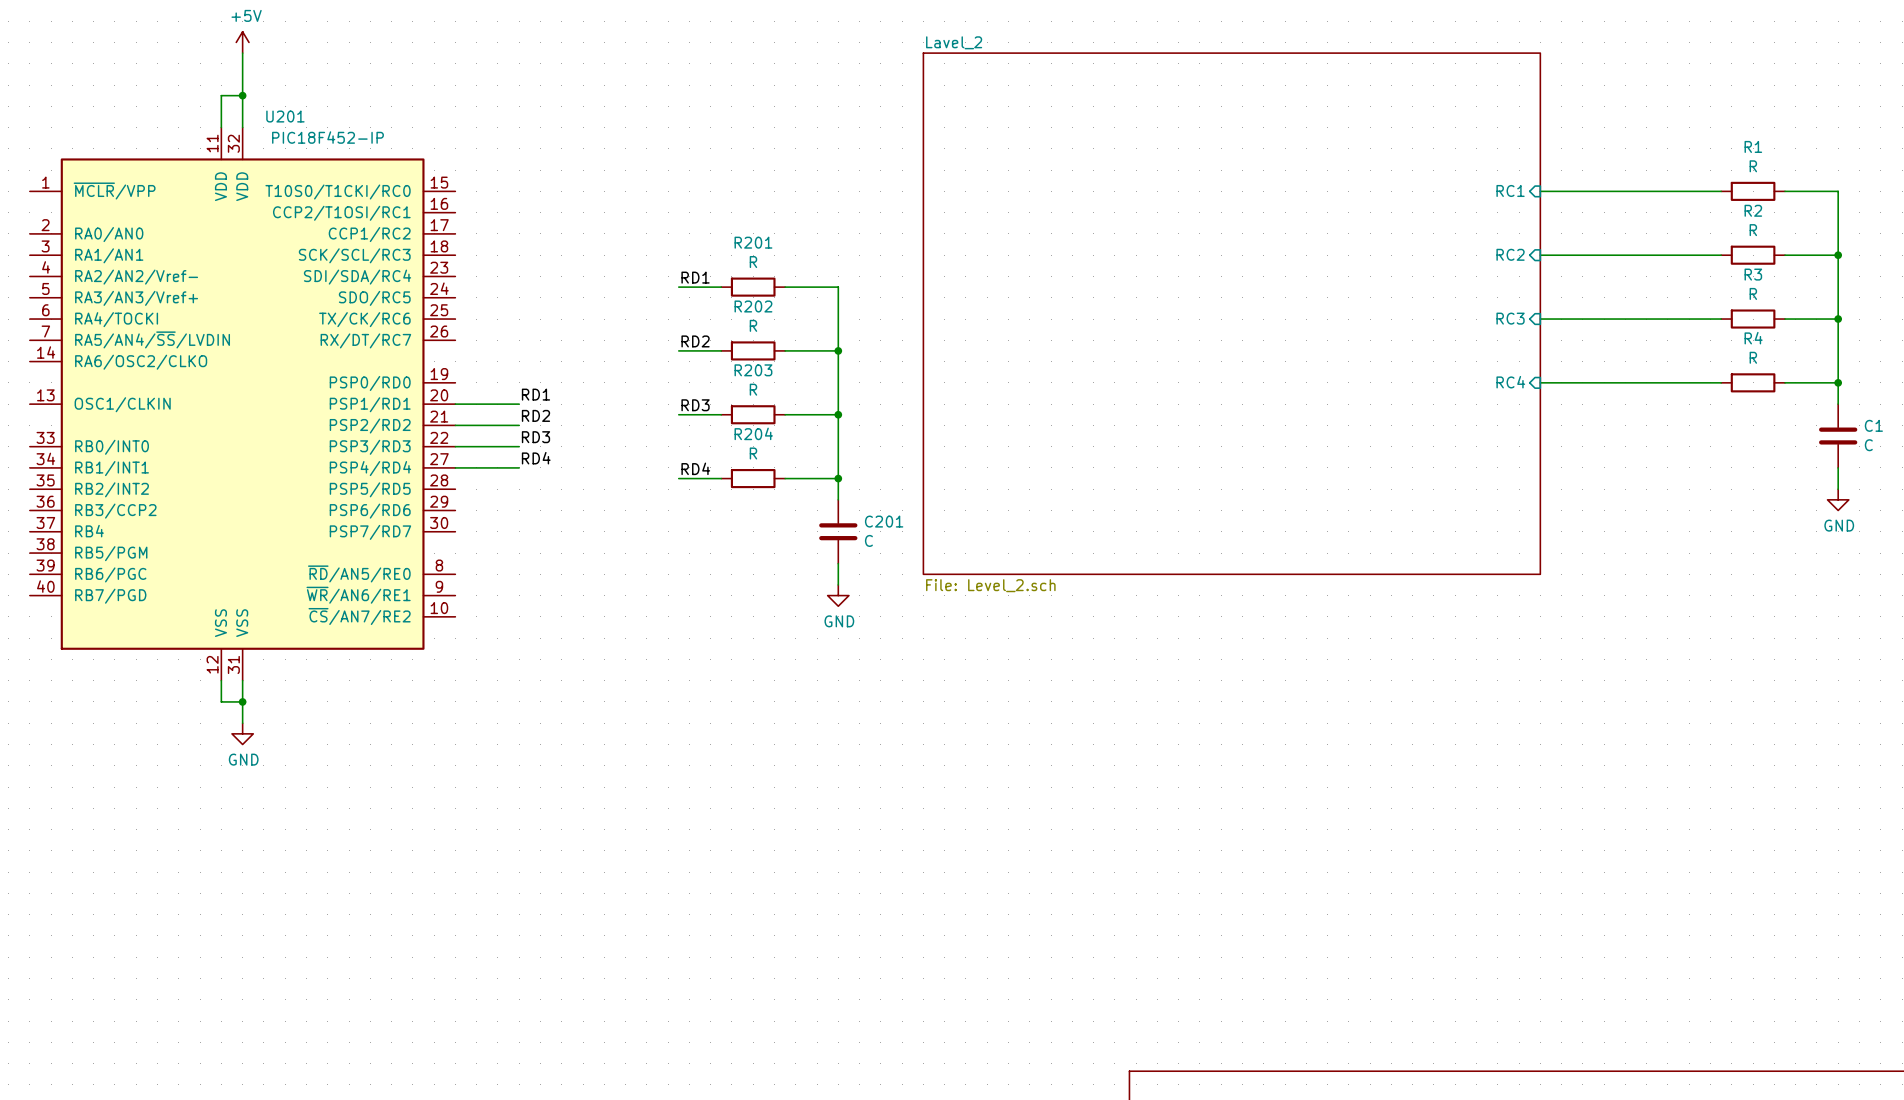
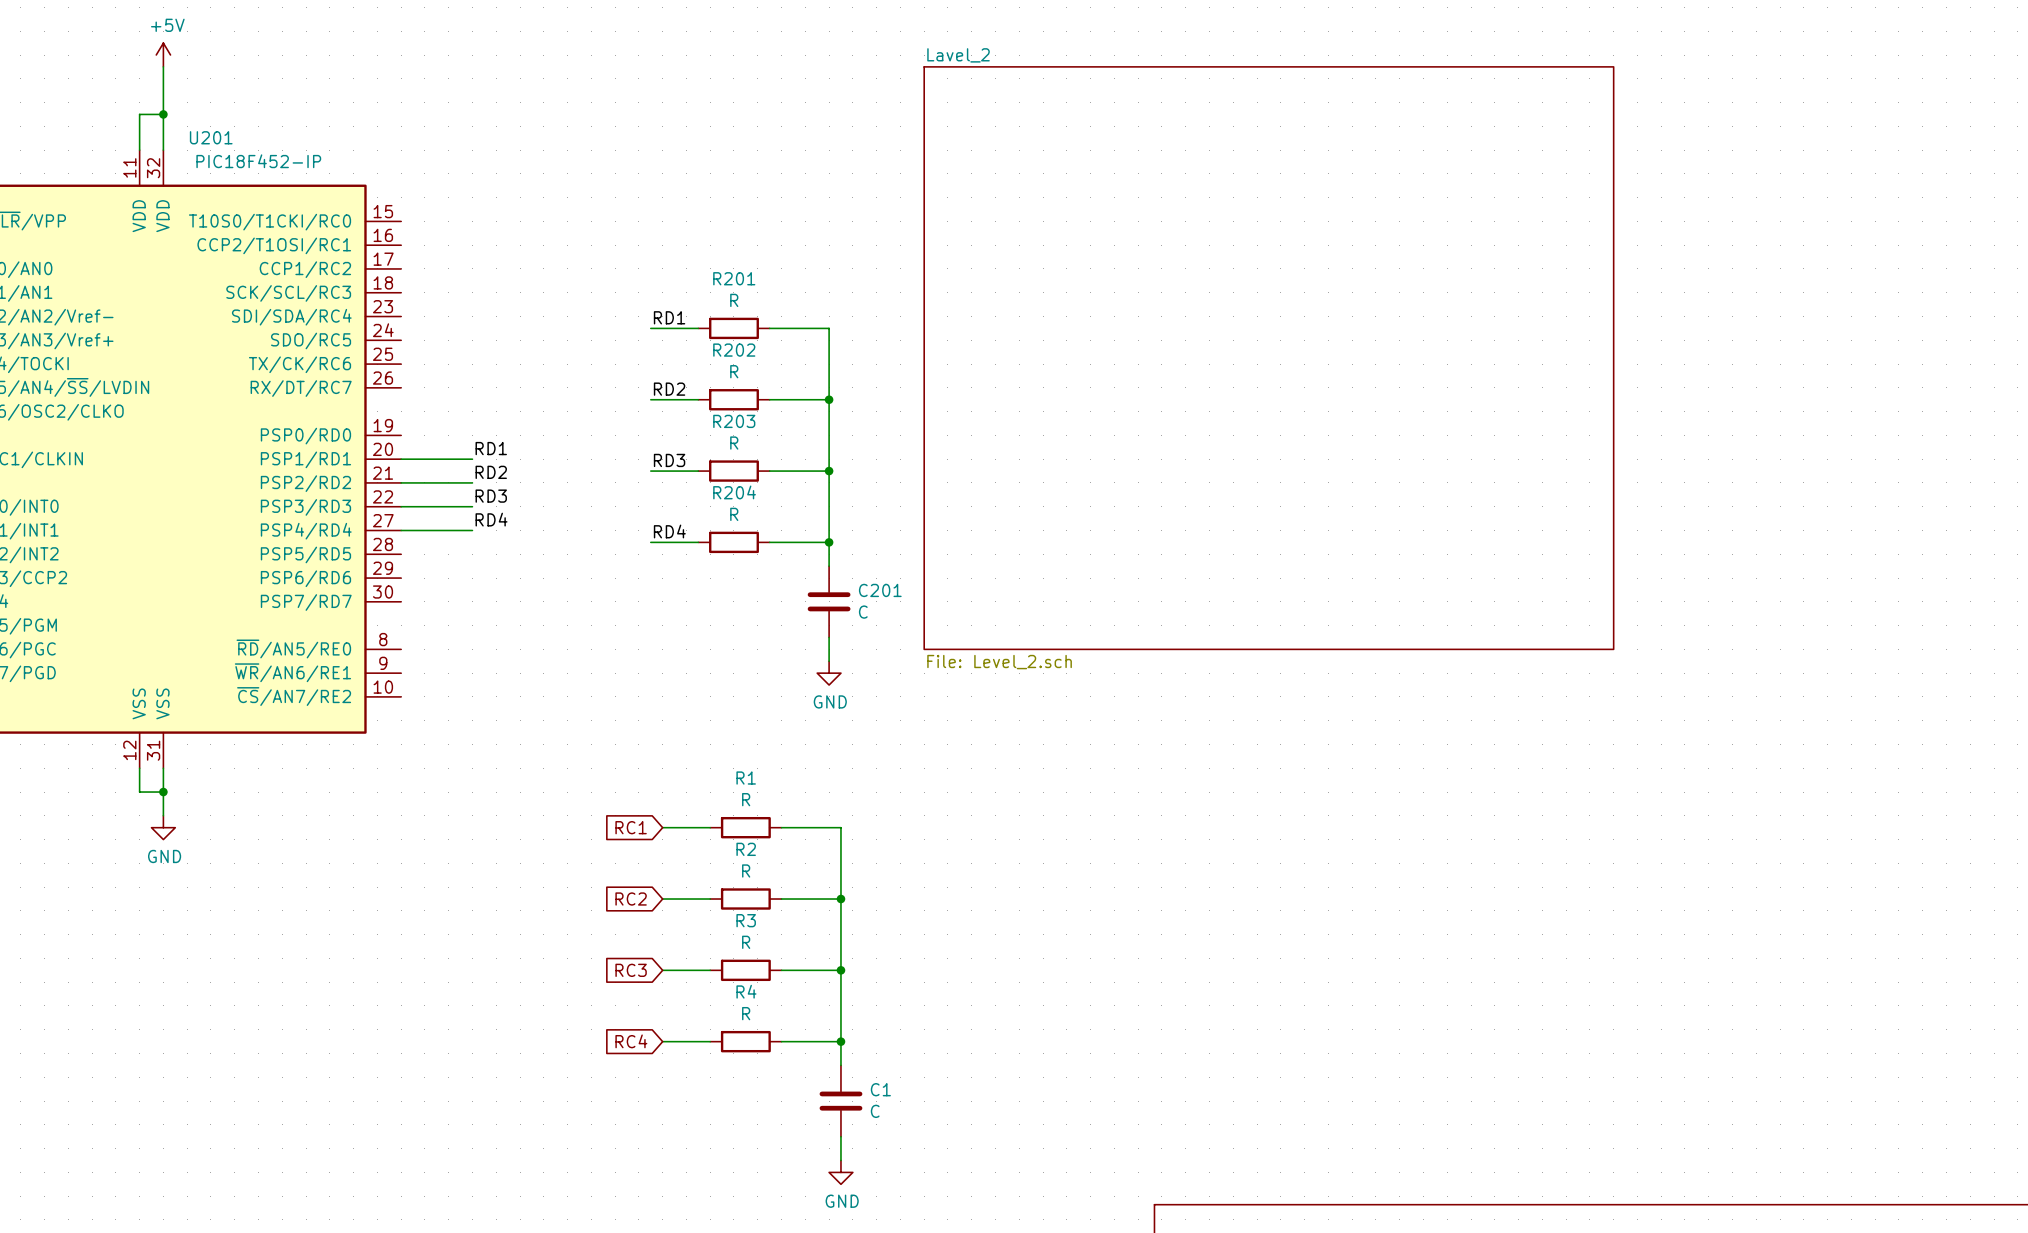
sheet pin: RC1 (1510, 190) -> none
wire: (1540, 191) (1721, 191) -> none
R1 position: (1753, 191) -> (745, 827)
wire: (1784, 191) (1838, 191) (1838, 404) -> none
sheet pin: RC2 (1510, 254) -> none
wire: (1540, 255) (1721, 255) -> none
R2 position: (1753, 255) -> (745, 899)
wire: (1784, 255) (1838, 255) -> none
junction: (1838, 255) -> none
sheet pin: RC3 (1510, 318) -> none
wire: (1540, 319) (1721, 319) -> none
R3 position: (1753, 319) -> (745, 970)
wire: (1784, 319) (1838, 319) -> none
junction: (1838, 319) -> none
sheet pin: RC4 (1510, 382) -> none
wire: (1540, 382) (1721, 382) -> none
R4 position: (1753, 382) -> (745, 1041)
wire: (1784, 382) (1838, 382) -> none
junction: (1838, 382) -> none
C1 position: (1838, 436) -> (840, 1101)
wire: (1838, 467) (1838, 489) -> none
power symbol: GND (1838, 499) -> none
global label: none -> RC1 (631, 827)
wire: none -> (662, 827) (710, 827)
wire: none -> (781, 827) (840, 827) (840, 1065)
global label: none -> RC2 (631, 899)
wire: none -> (662, 899) (710, 899)
wire: none -> (781, 899) (840, 899)
junction: none -> (840, 899)
global label: none -> RC3 (631, 970)
wire: none -> (662, 970) (710, 970)
wire: none -> (781, 970) (840, 970)
junction: none -> (840, 970)
global label: none -> RC4 (631, 1041)
wire: none -> (662, 1041) (710, 1041)
wire: none -> (781, 1041) (840, 1041)
junction: none -> (840, 1041)
wire: none -> (840, 1136) (840, 1160)
power symbol: none -> GND (840, 1172)

